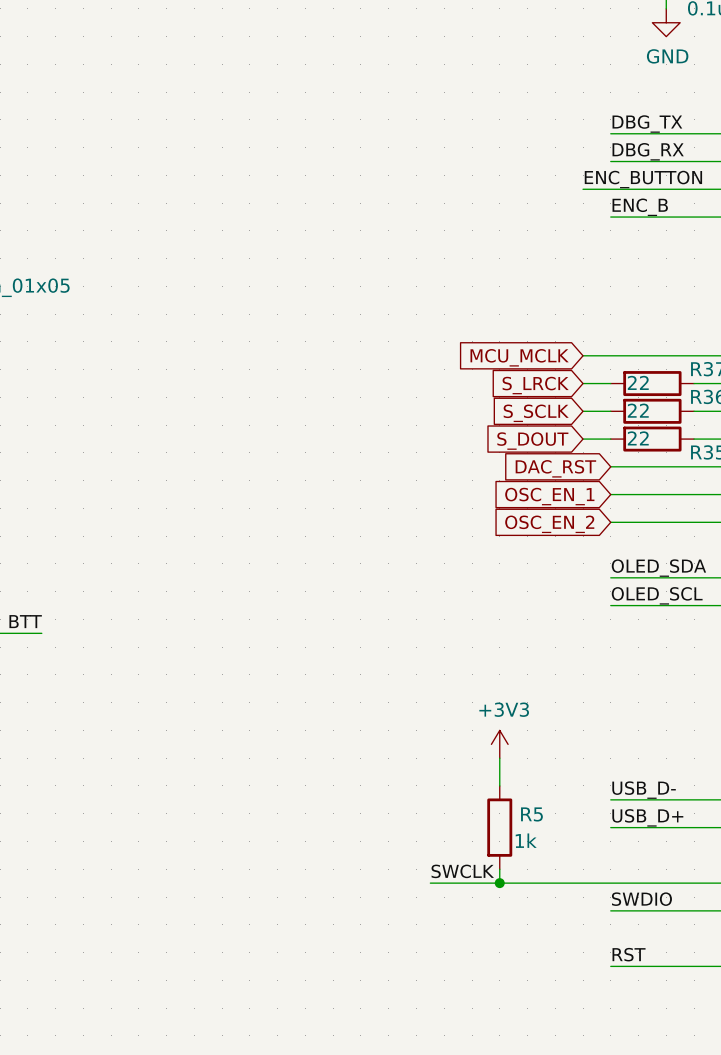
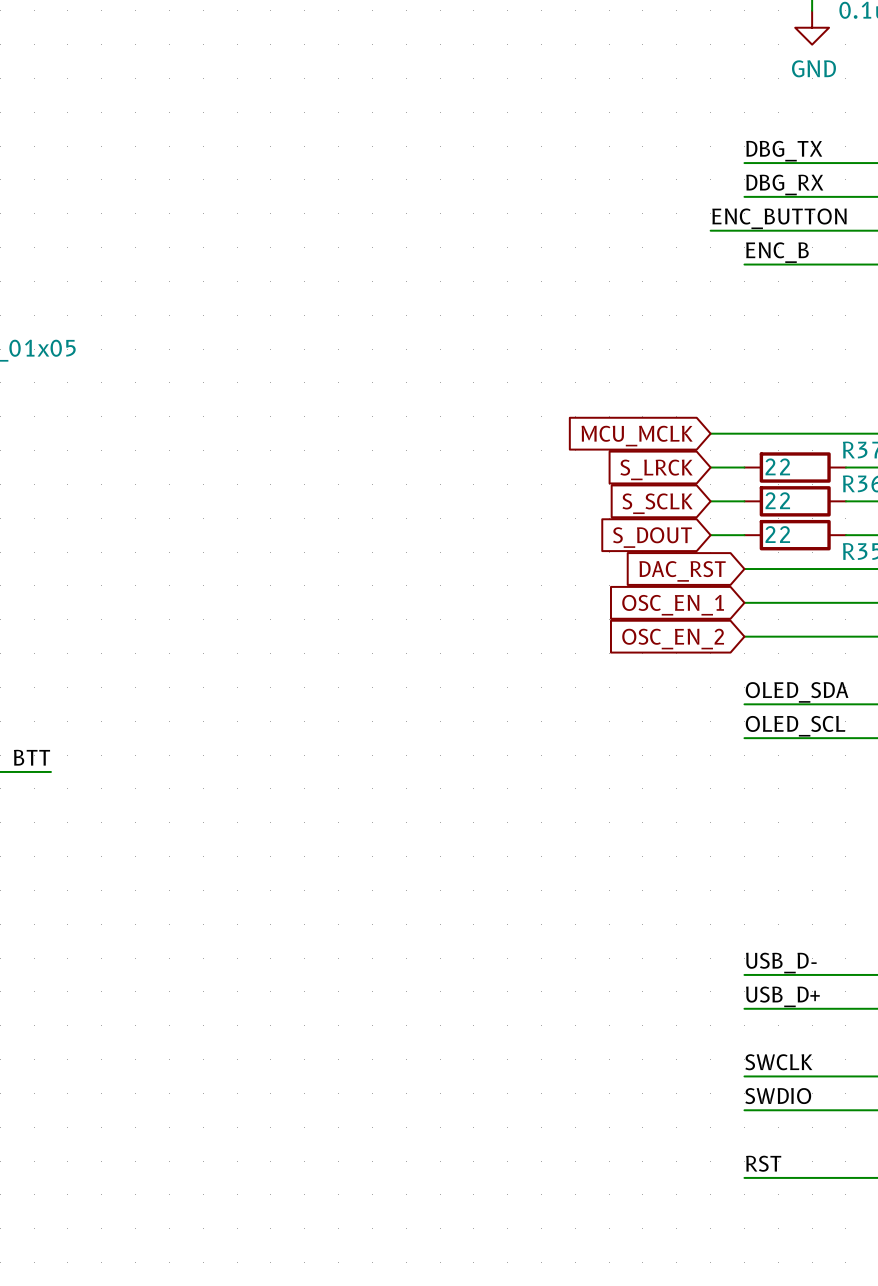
power symbol: +3V3 (499, 744) -> none
wire: (499, 758) (499, 785) -> none
R5: 1k (499, 827) -> none
wire: (499, 869) (499, 883) -> none
label position: SWCLK (462, 871) -> SWCLK (778, 1062)
wire: (430, 883) (610, 883) -> none
junction: (499, 883) -> none

